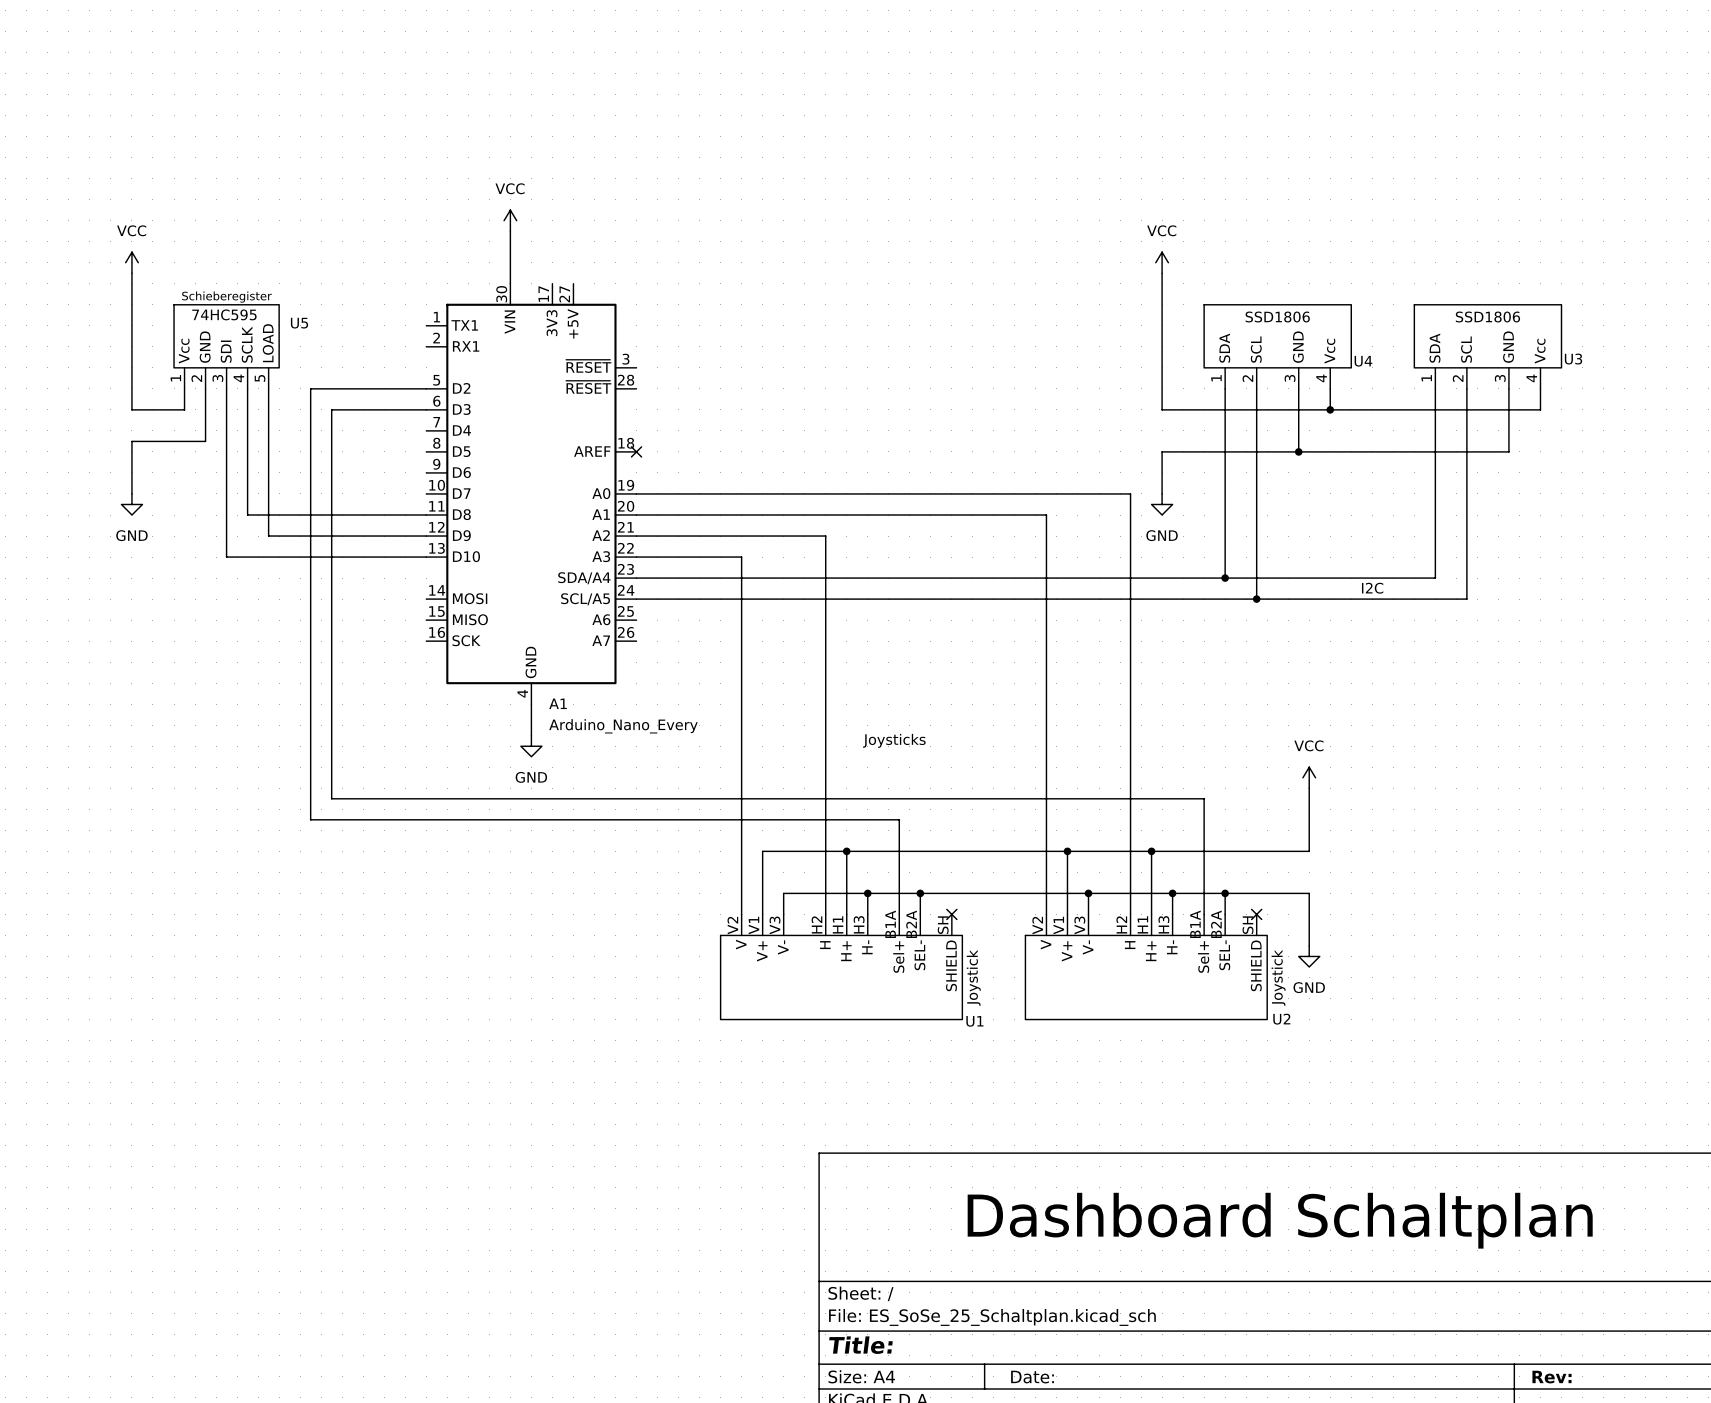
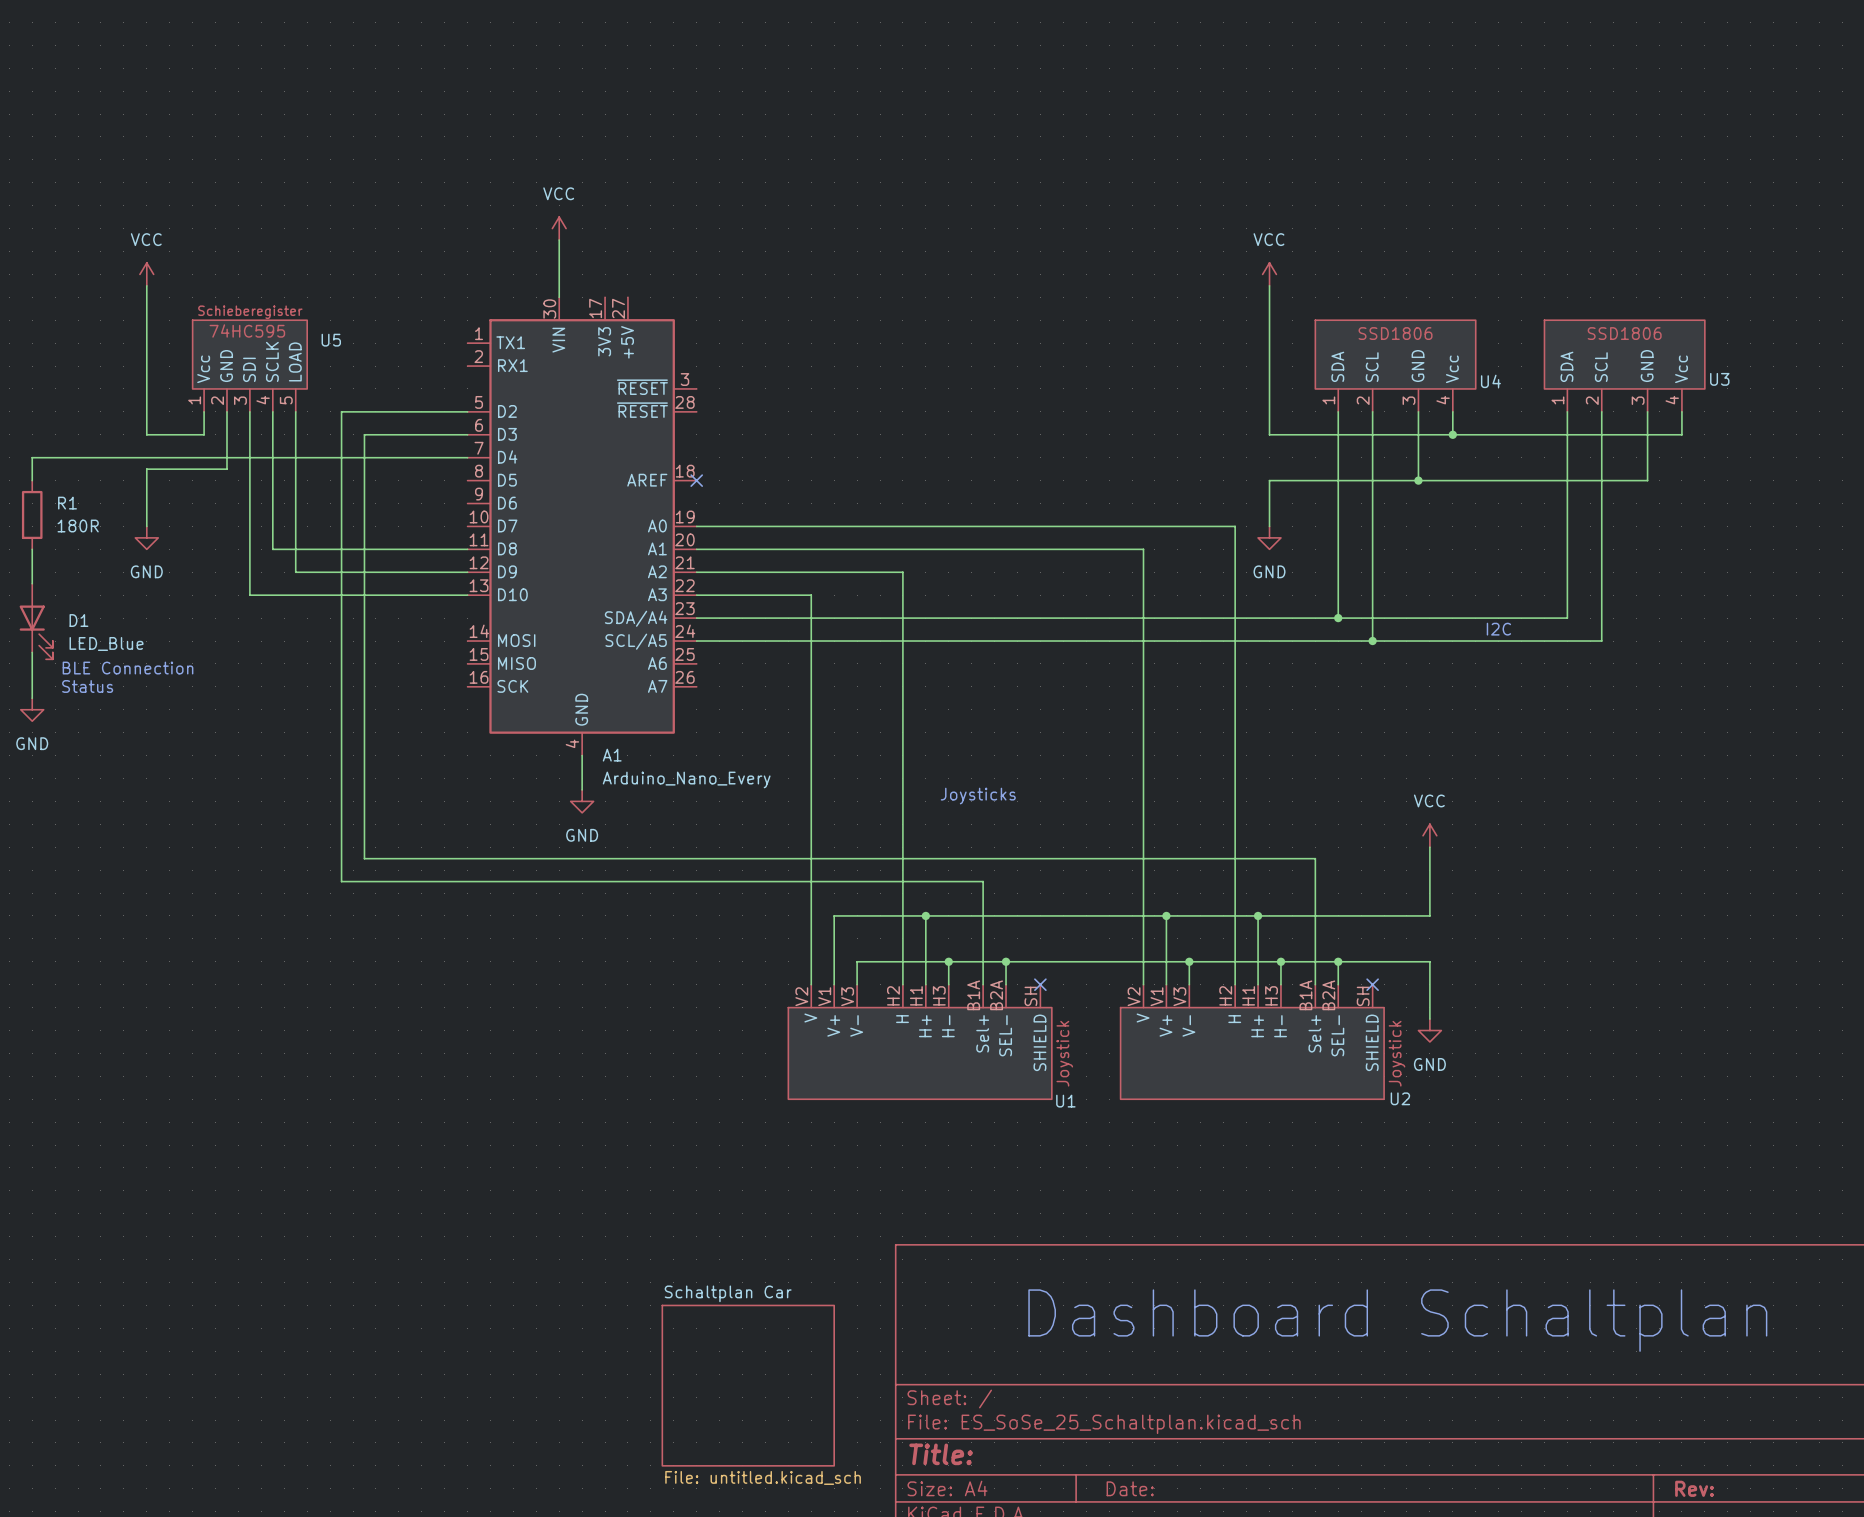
wire: none -> (467, 457) (32, 457) (32, 480)
R1: none -> 180R (32, 514)
wire: none -> (32, 549) (32, 583)
D1: none -> LED_Blue (36, 621)
wire: none -> (32, 652) (32, 698)
text: none -> BLE Connection (128, 668)
text: none -> Status (87, 686)
power symbol: none -> GND (32, 709)
sheet Schaltplan Car: none -> File: untitled.kicad_sch (748, 1385)

